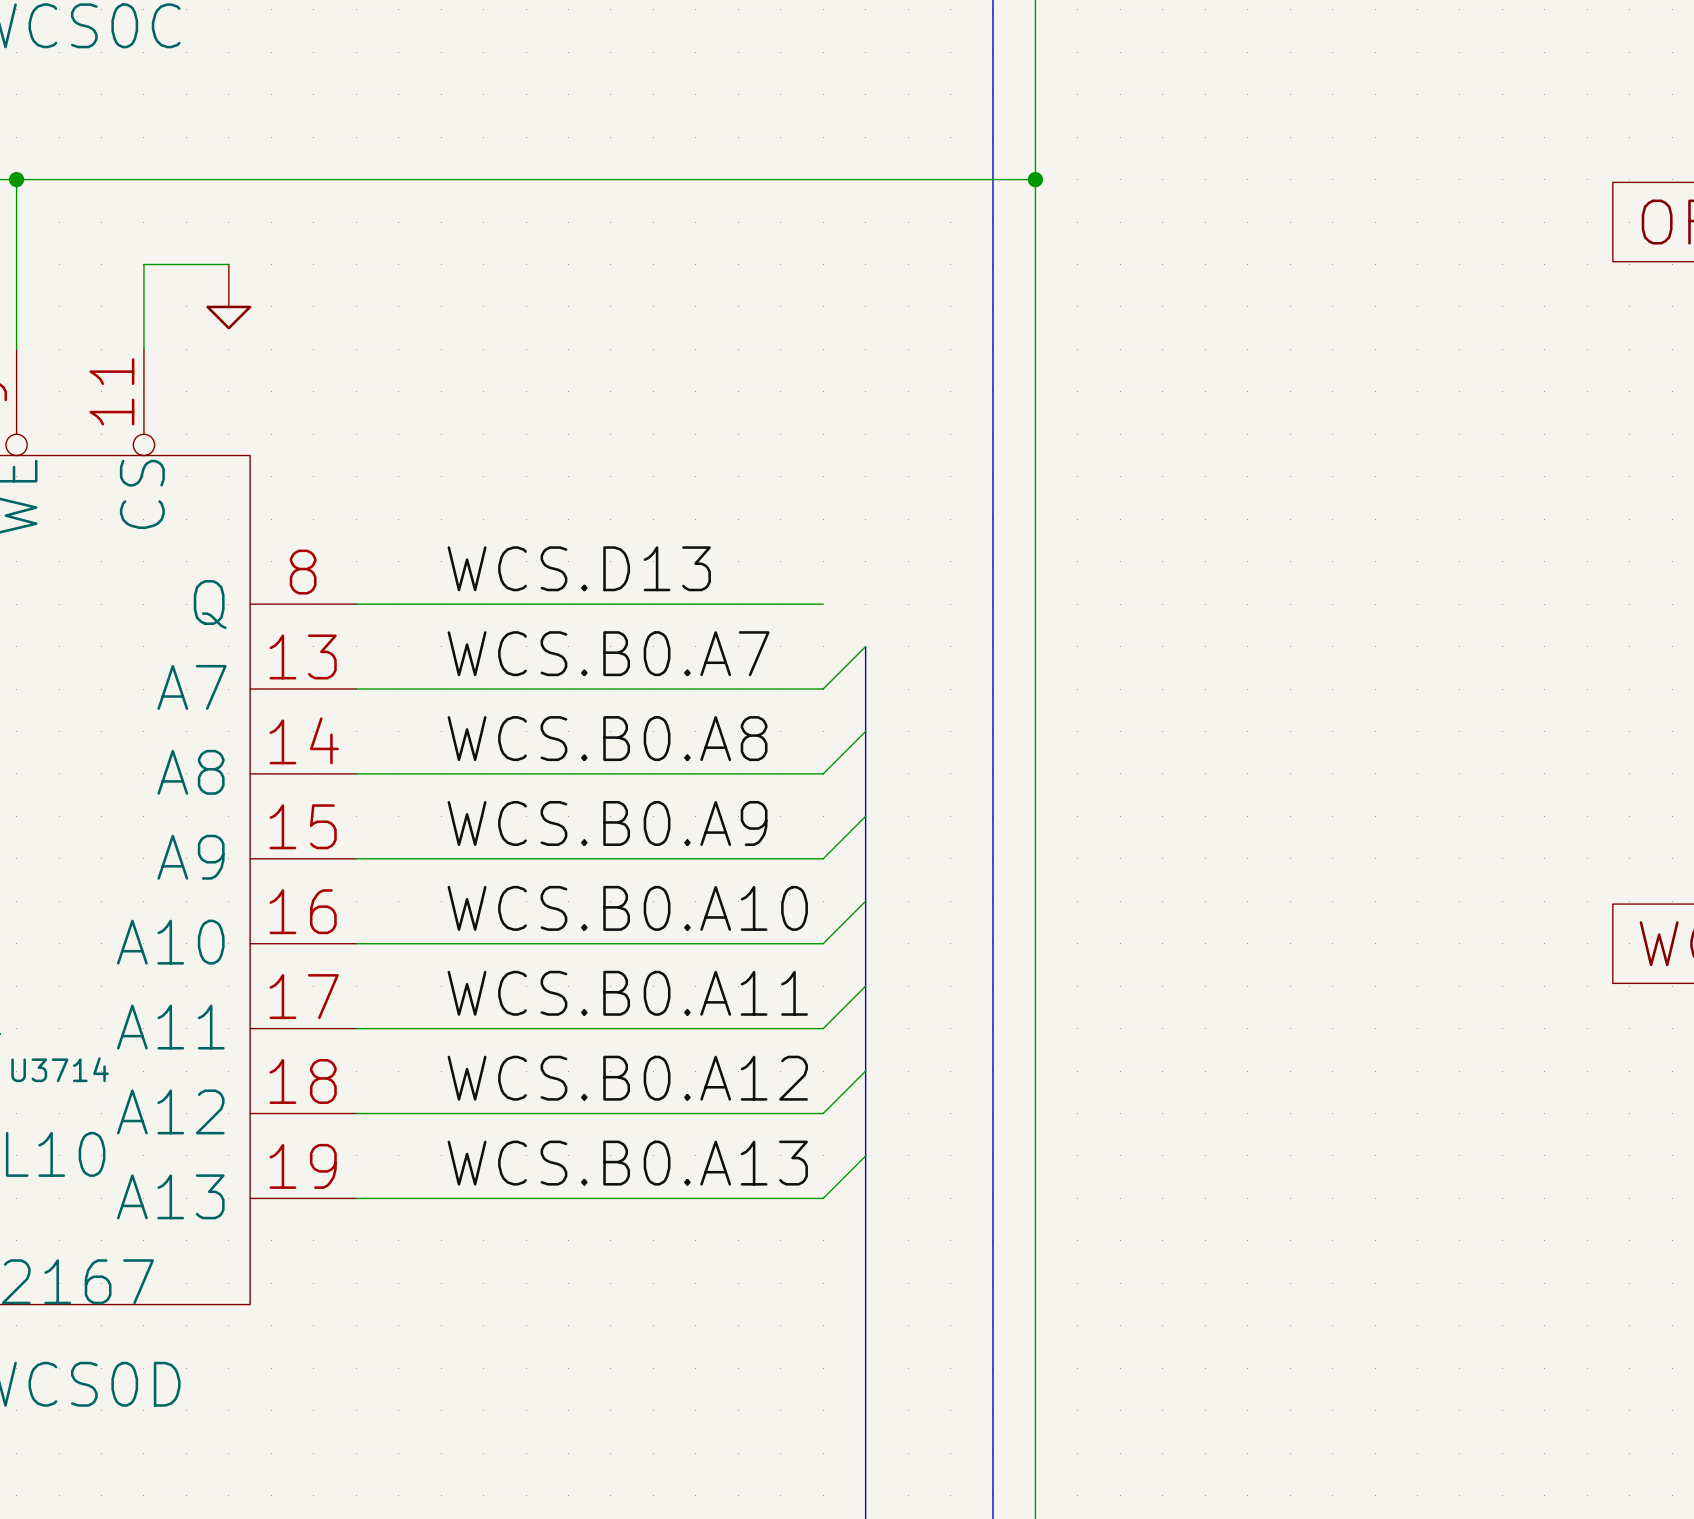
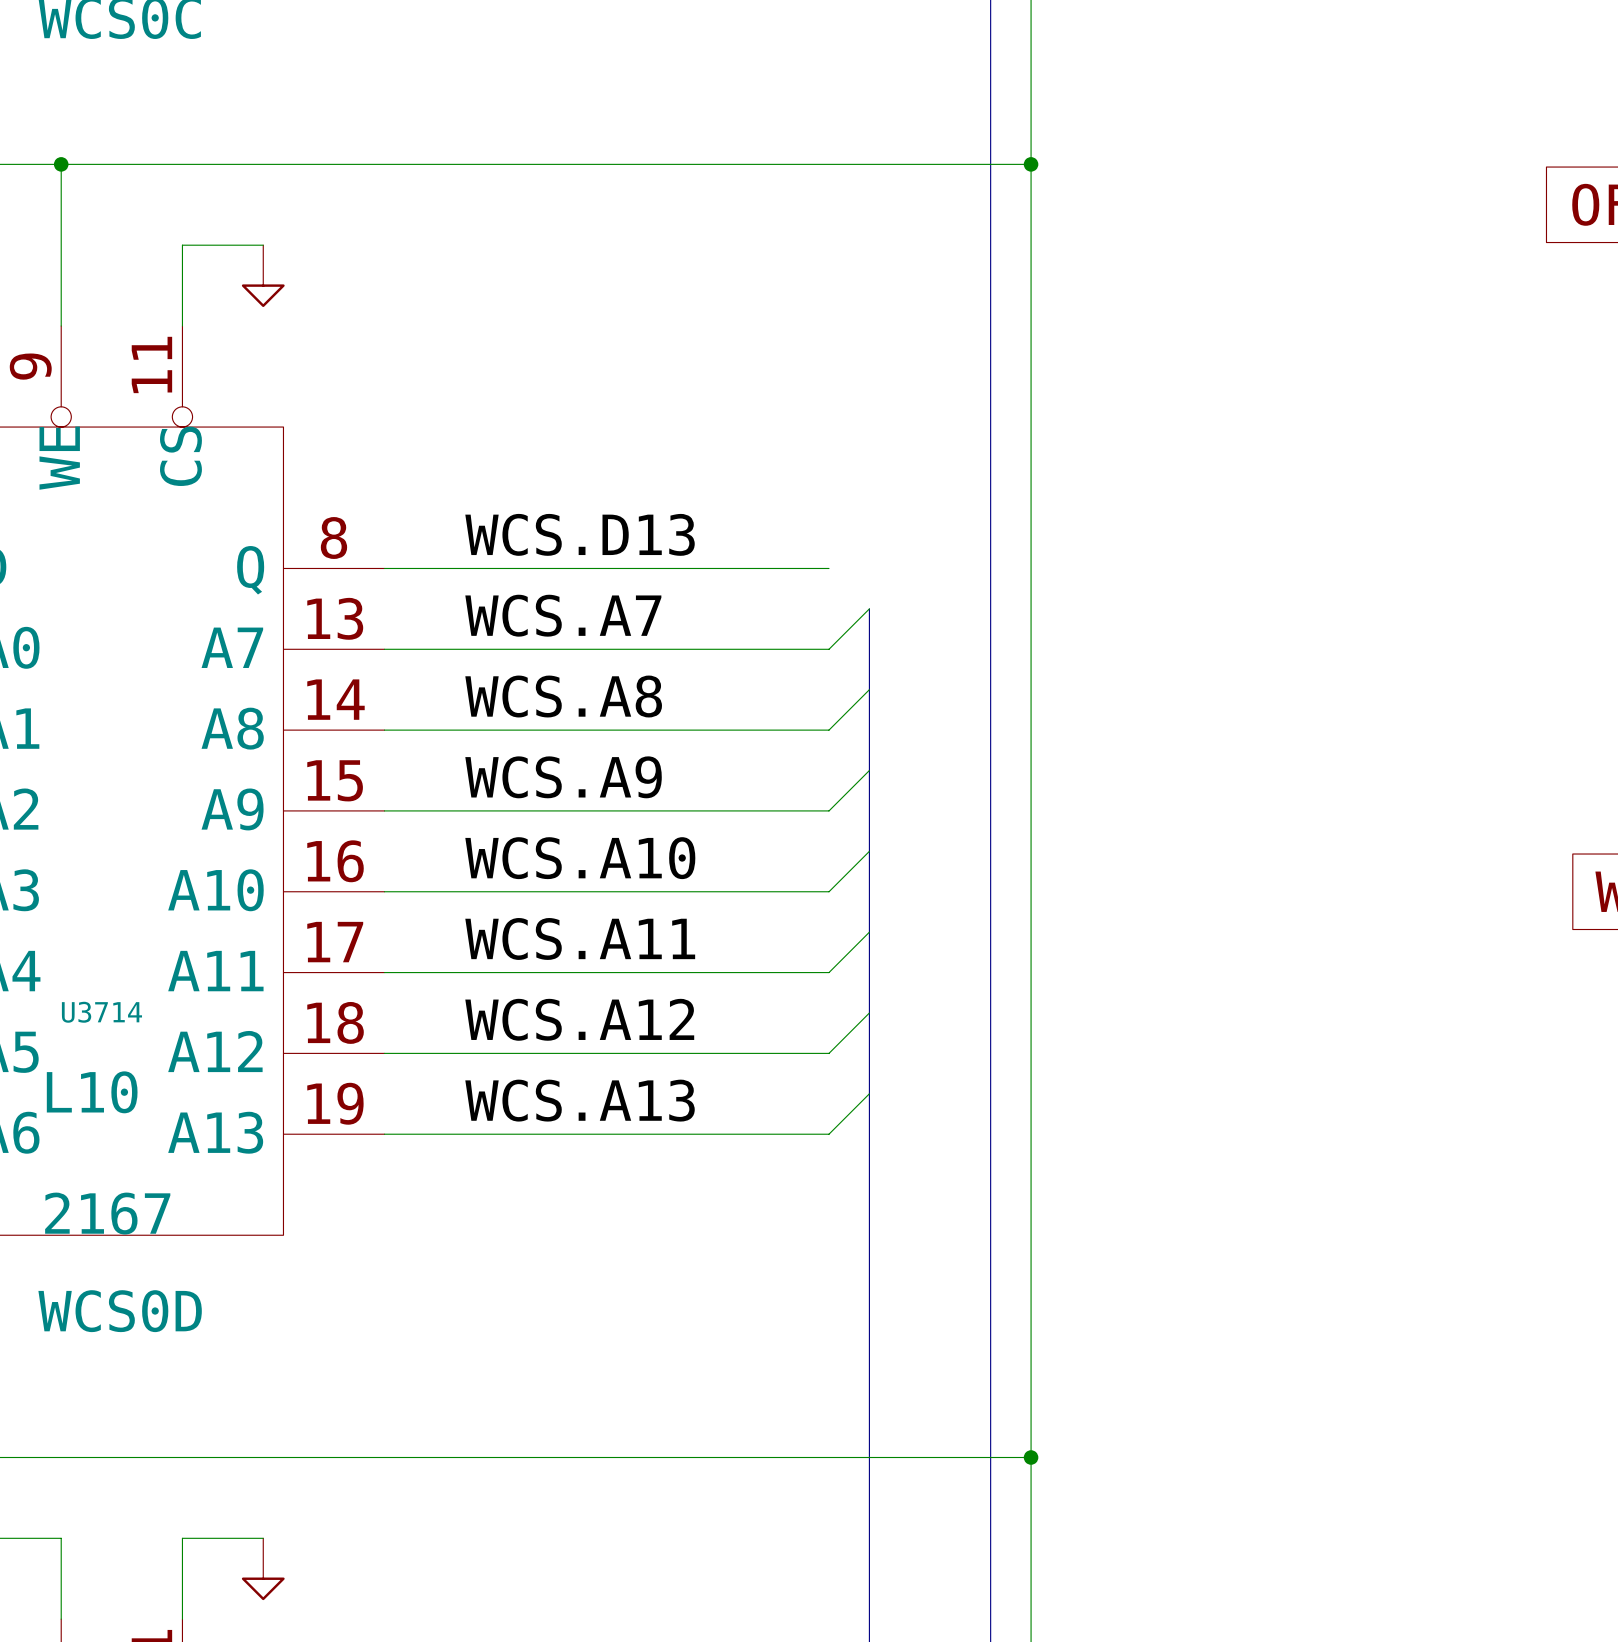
label: WCS.B0.A7 (608, 653) -> WCS.A7 (563, 615)
label: WCS.B0.A8 (607, 738) -> WCS.A8 (563, 696)
label: WCS.B0.A9 (607, 823) -> WCS.A9 (563, 777)
label: WCS.B0.A10 (627, 908) -> WCS.A10 (580, 858)
label: WCS.B0.A11 (627, 993) -> WCS.A11 (580, 938)
label: WCS.B0.A12 (627, 1078) -> WCS.A12 (579, 1019)
label: WCS.B0.A13 (627, 1163) -> WCS.A13 (580, 1100)

